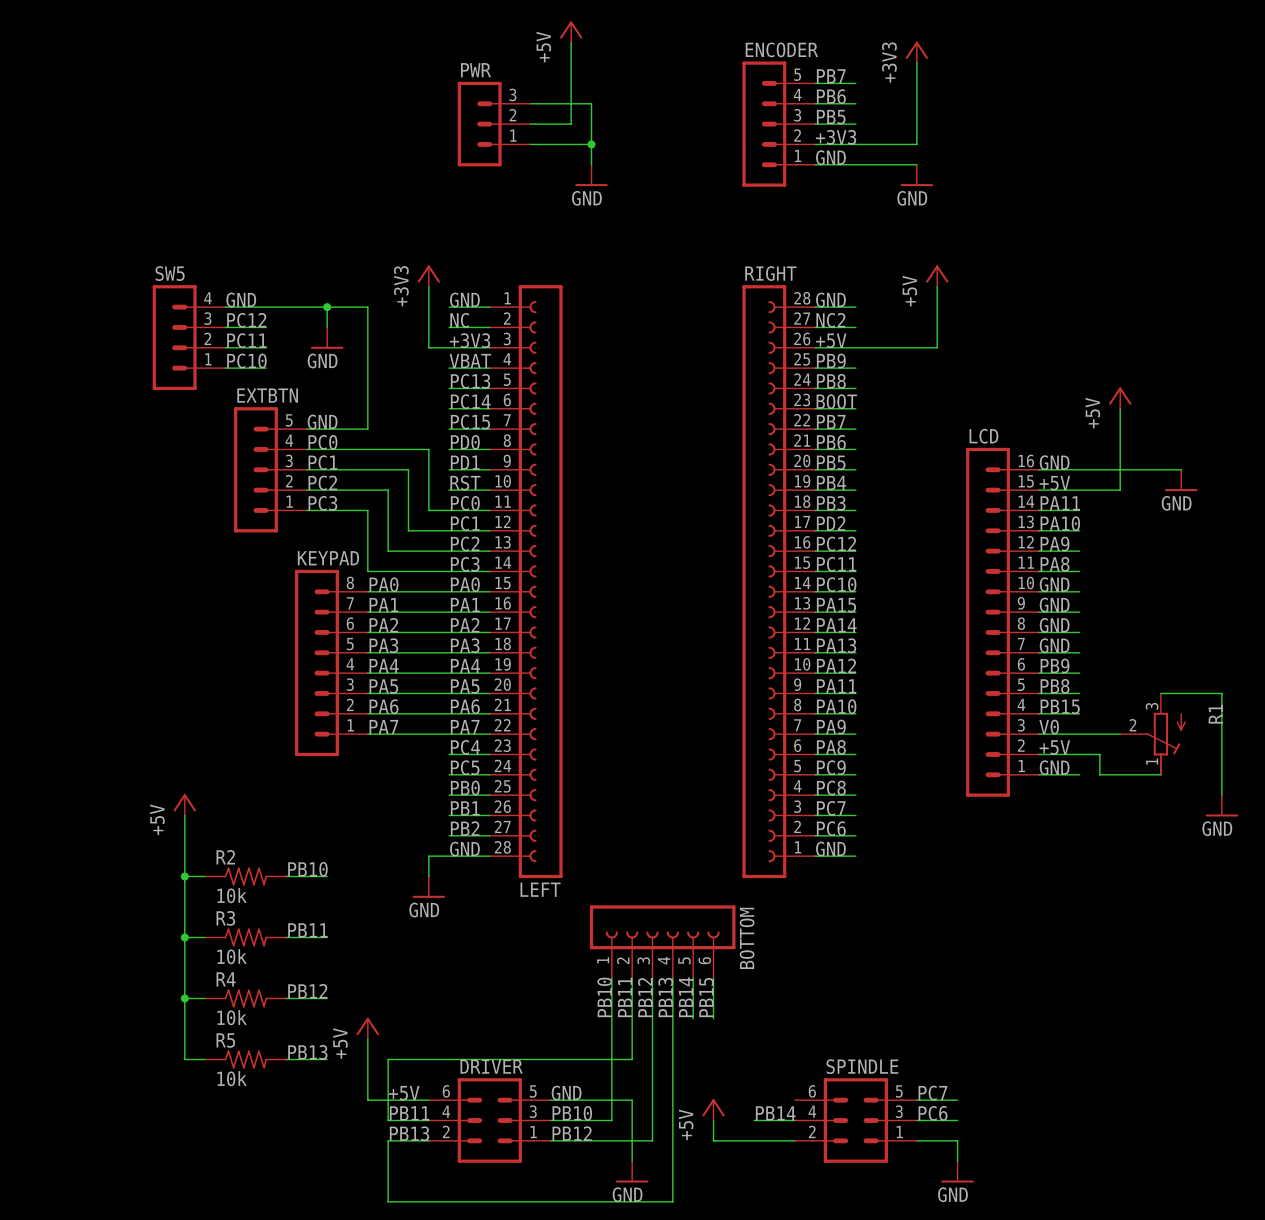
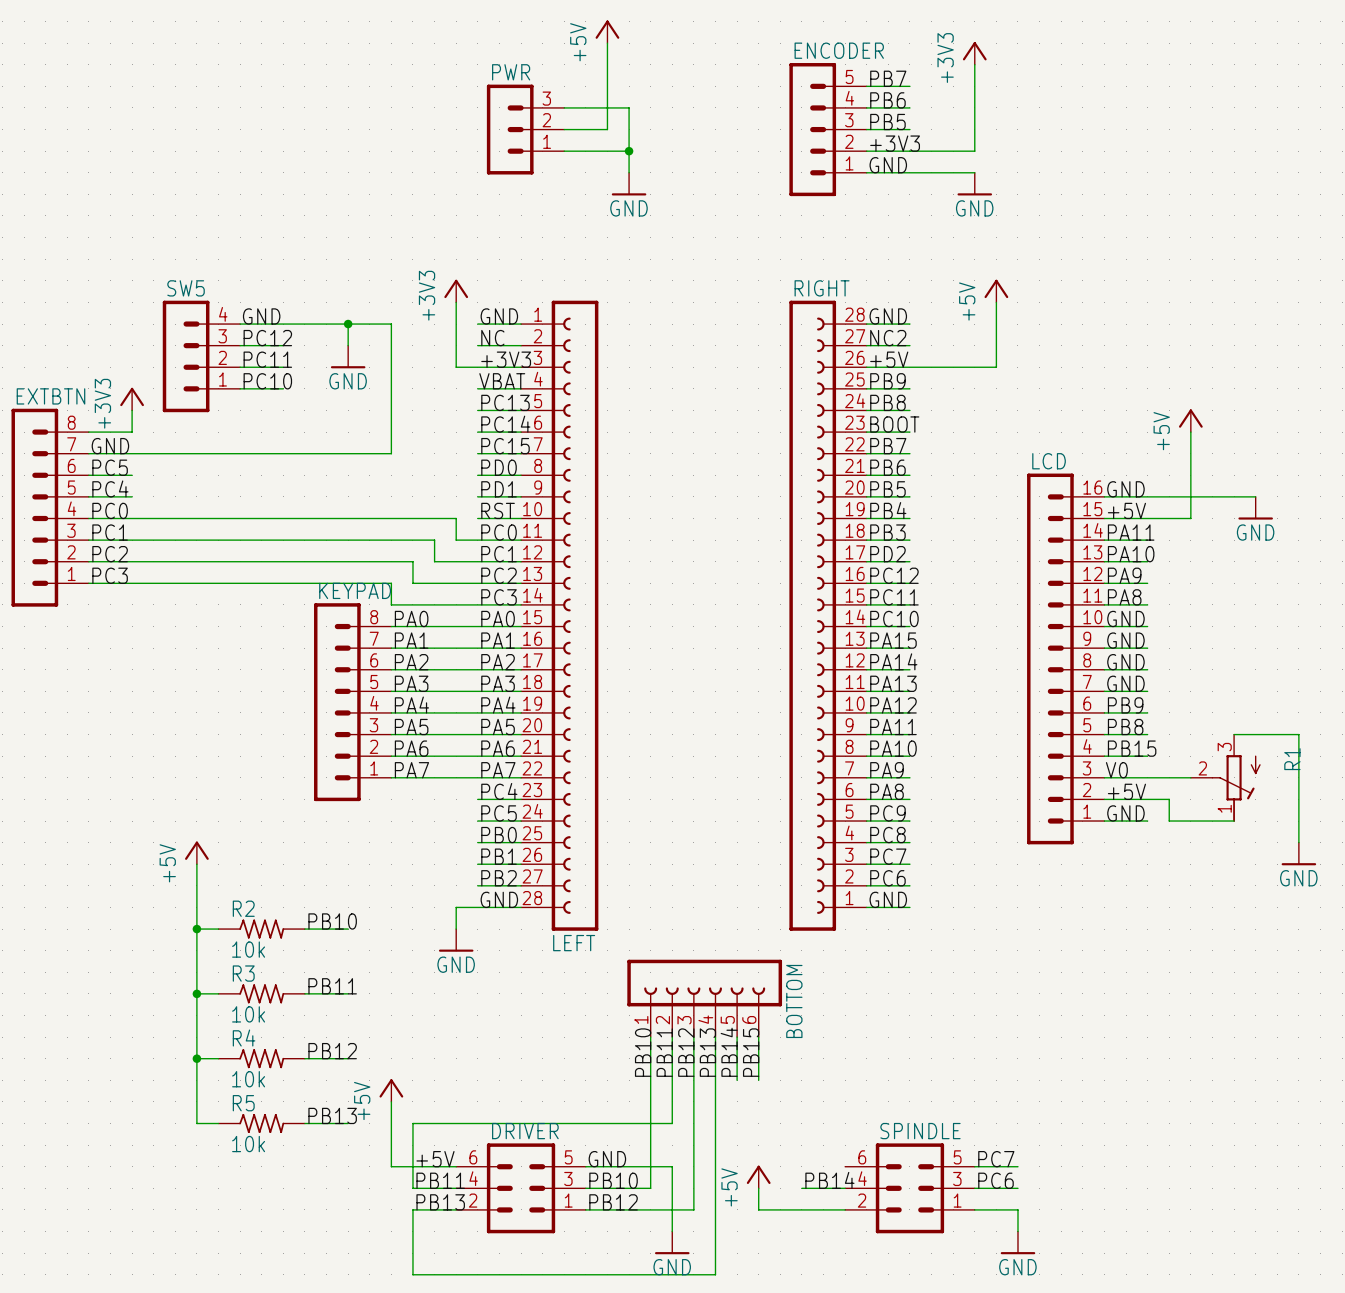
power symbol: none -> +3V3 (132, 399)
wire: none -> (132, 410) (132, 432) (88, 432)
label: none -> GND (110, 446)
label: GND (322, 422) -> none
wire: none -> (88, 453) (326, 453)
label: none -> PC5 (110, 467)
label: PC0 (322, 442) -> none
wire: none -> (88, 475) (132, 475)
wire: (306, 449) (428, 449) (428, 490) -> none
label: none -> PC4 (110, 488)
label: PC1 (322, 462) -> none
wire: none -> (88, 496) (132, 496)
EXTBTN: (270, 469) -> none
wire: (306, 469) (408, 469) (408, 510) -> none
EXTBTN: none -> (50, 507)
label: none -> PC0 (110, 510)
label: PC2 (322, 483) -> none
wire: none -> (88, 518) (326, 518)
wire: (388, 490) (388, 530) -> (412, 518) (456, 518)
label: none -> PC1 (110, 532)
label: PC3 (322, 503) -> none
wire: none -> (88, 540) (326, 540)
wire: (367, 510) (367, 551) -> (391, 540) (434, 540)
label: none -> PC2 (110, 554)
wire: none -> (88, 561) (412, 561)
label: none -> PC3 (110, 575)
wire: none -> (88, 583) (391, 583)

